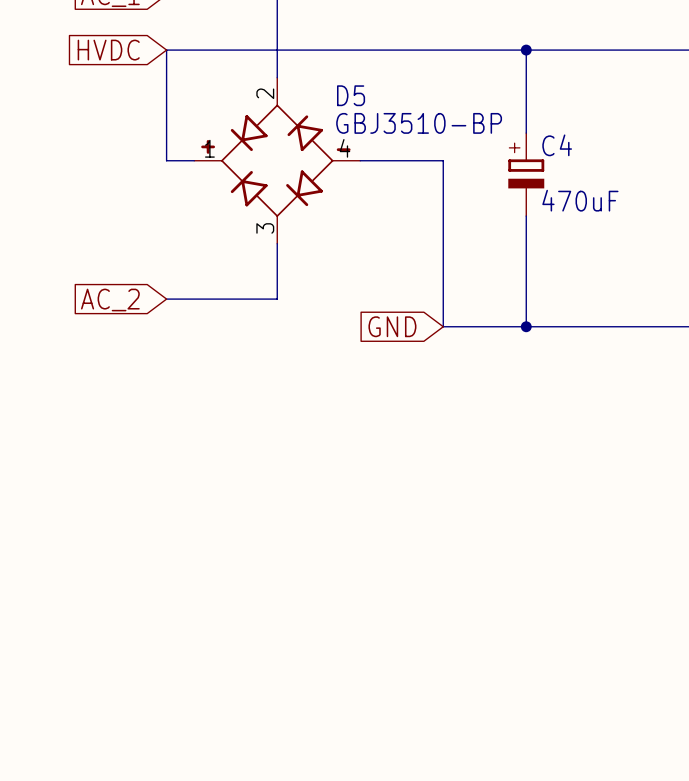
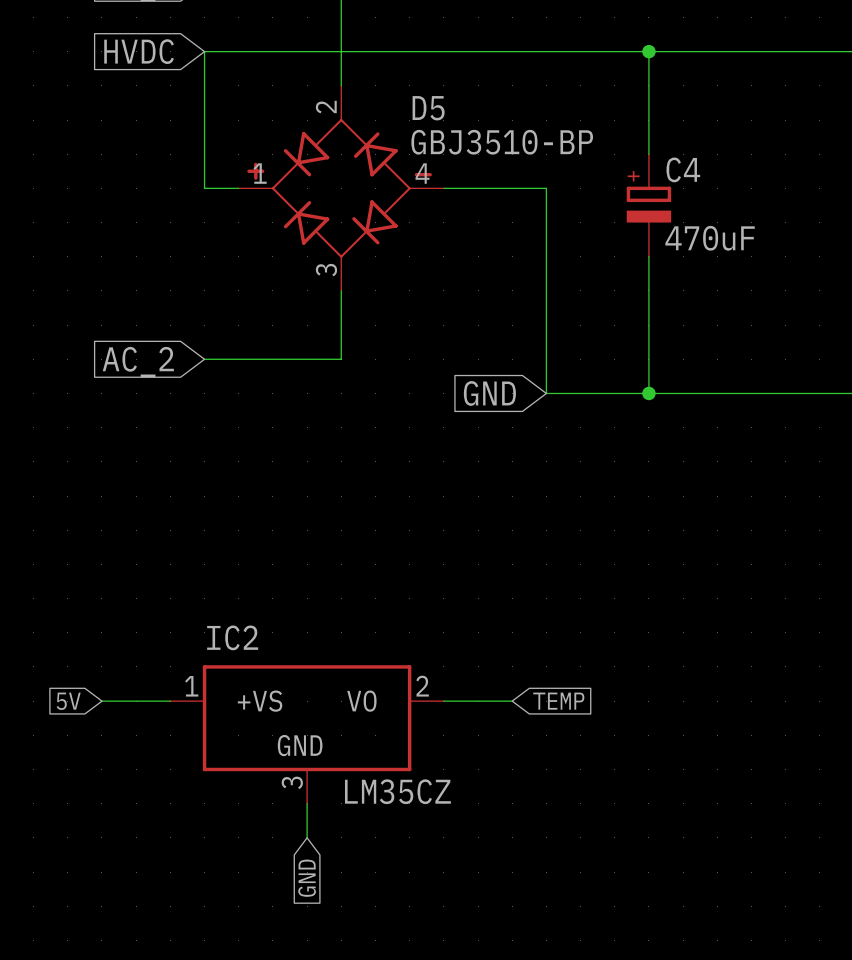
global label: none -> 5V (68, 701)
wire: none -> (101, 701) (170, 701)
wire: none -> (443, 701) (512, 701)
global label: none -> TEMP (558, 701)
IC2: none -> LM35CZ (307, 734)
wire: none -> (307, 803) (307, 837)
global label: none -> GND (307, 878)

